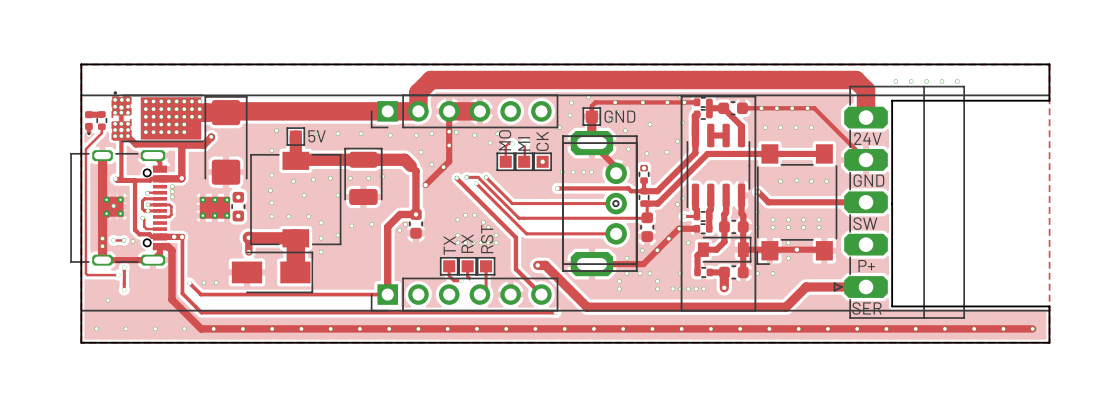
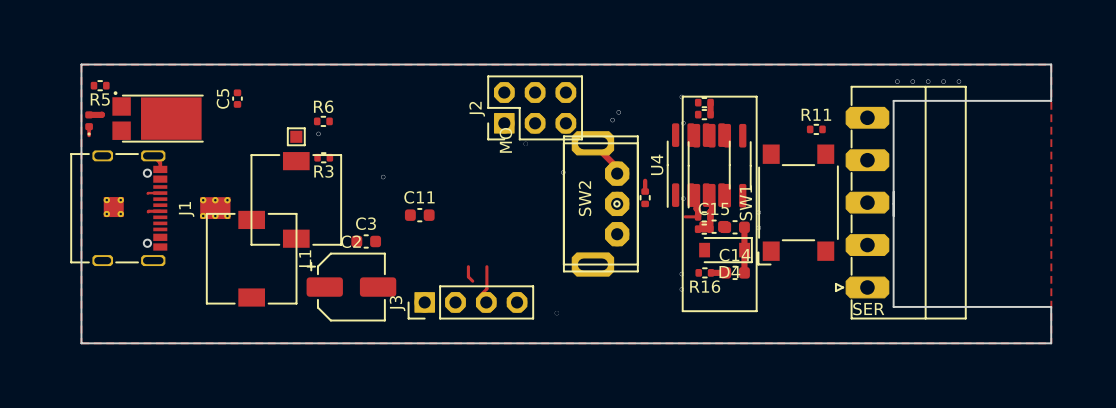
R5: none -> (100, 85)
line: (81, 95) (1049, 95) -> none
via: (588, 96) -> none
zone outline: (112, 97) (112, 139) (130, 139) (130, 97) (112, 97) -> none
C5: none -> (237, 98)
via: (115, 99) -> none
via: (121, 99) -> none
via: (128, 99) -> none
via: (145, 101) -> none
via: (153, 101) -> none
via: (161, 101) -> none
via: (168, 101) -> none
via: (176, 101) -> none
via: (184, 101) -> none
via: (191, 101) -> none
via: (199, 101) -> none
via: (571, 102) -> none
via: (615, 102) -> none
via: (642, 102) -> none
via: (667, 102) -> none
via: (684, 102) -> none
track: (697, 102) (595, 102) (591, 106) (591, 142) -> none
via: (115, 106) -> none
via: (128, 106) -> none
track: (121, 107) (121, 178) -> none
via: (121, 107) -> none
J2: none -> (535, 107)
track: (709, 108) (723, 108) (741, 126) (741, 135) -> none
part: (733, 108) -> none
track: (742, 108) (814, 108) (866, 159) -> none
via: (761, 108) -> none
via: (776, 108) -> none
via: (792, 108) -> none
via: (807, 108) -> none
via: (145, 109) -> none
via: (153, 109) -> none
via: (161, 109) -> none
via: (168, 109) -> none
via: (176, 109) -> none
via: (184, 109) -> none
via: (191, 109) -> none
via: (199, 109) -> none
part: (464, 111) -> none
track: (479, 111) (449, 111) (449, 161) (425, 185) -> none
via: (115, 112) -> none
via: (121, 112) -> none
via: (128, 112) -> none
track: (697, 114) (695, 116) (695, 153) (657, 191) (631, 191) (628, 188) (557, 188) -> none
via: (570, 115) -> none
via: (145, 116) -> none
via: (153, 116) -> none
via: (161, 116) -> none
via: (168, 116) -> none
via: (176, 116) -> none
via: (184, 116) -> none
via: (191, 116) -> none
via: (199, 116) -> none
part: (591, 116) -> none
text: GND (619, 116) -> none
track: (866, 117) (866, 90) (855, 80) (431, 80) (418, 92) (418, 111) (178, 112) (171, 119) -> none
part: (101, 120) -> none
R6: none -> (323, 121)
via: (115, 123) -> none
via: (121, 123) -> none
via: (128, 123) -> none
via: (145, 124) -> none
via: (153, 124) -> none
via: (161, 124) -> none
via: (168, 124) -> none
via: (176, 124) -> none
via: (184, 124) -> none
via: (649, 124) -> none
track: (101, 126) (101, 133) (85, 149) (85, 273) (118, 275) -> none
via: (559, 127) -> none
via: (765, 127) -> none
via: (780, 127) -> none
via: (795, 127) -> none
via: (811, 127) -> none
R11: none -> (816, 129)
via: (115, 130) -> none
track: (121, 130) (135, 144) (181, 144) (181, 178) -> none
via: (121, 130) -> none
via: (128, 130) -> none
via: (276, 130) -> none
via: (625, 130) -> none
via: (449, 131) -> none
via: (145, 132) -> none
via: (153, 132) -> none
via: (161, 132) -> none
via: (168, 132) -> none
via: (176, 132) -> none
via: (184, 132) -> none
via: (456, 132) -> none
via: (337, 133) -> none
via: (361, 133) -> none
via: (431, 133) -> none
via: (497, 133) -> none
via: (89, 135) -> none
via: (390, 135) -> none
via: (416, 135) -> none
via: (474, 135) -> none
track: (710, 135) (726, 135) -> none
via: (115, 136) -> none
via: (121, 136) -> none
via: (128, 136) -> none
track: (211, 136) (203, 145) (181, 145) (181, 178) -> none
via: (211, 136) -> none
track: (295, 136) (295, 160) (404, 159) (415, 171) (415, 214) (400, 214) (387, 226) (387, 294) (200, 294) (189, 283) -> none
text: 5V (317, 136) -> none
text: 24V (867, 138) -> none
part: (226, 140) -> none
text: CK (542, 141) -> none
via: (677, 141) -> none
via: (490, 142) -> none
track: (512, 143) (508, 143) (505, 146) (505, 161) -> none
via: (512, 143) -> none
track: (524, 143) (524, 161) -> none
text: MI (524, 143) -> none
via: (449, 145) -> none
via: (628, 149) -> none
via: (271, 150) -> none
via: (420, 152) -> none
via: (666, 152) -> none
via: (646, 153) -> none
track: (824, 153) (707, 153) (657, 203) (644, 203) -> none
track: (102, 155) (102, 260) (153, 260) (160, 253) (160, 246) (168, 246) (171, 250) (171, 299) (201, 328) (1032, 328) -> none
R3: none -> (323, 157)
part: (505, 161) -> none
part: (524, 161) -> none
part: (542, 161) -> none
via: (542, 161) -> none
via: (431, 164) -> none
U4: none -> (698, 165)
via: (443, 167) -> none
via: (644, 168) -> none
via: (573, 172) -> none
via: (583, 172) -> none
via: (591, 172) -> none
part: (644, 174) -> none
via: (271, 175) -> none
part: (363, 176) -> none
track: (456, 177) (515, 237) (515, 269) (541, 294) -> none
via: (456, 177) -> none
track: (466, 177) (478, 177) (519, 218) (646, 218) (648, 203) -> none
via: (466, 177) -> none
track: (486, 177) (512, 203) (616, 203) -> none
via: (486, 177) -> none
via: (115, 178) -> none
track: (181, 178) (152, 178) (150, 180) (115, 178) (121, 178) -> none
via: (181, 178) -> none
via: (330, 178) -> none
via: (350, 178) -> none
via: (368, 178) -> none
via: (313, 179) -> none
track: (116, 180) (135, 180) (135, 229) (139, 234) (149, 234) (152, 236) (182, 236) -> none
via: (796, 180) -> none
text: GND (868, 180) -> none
via: (293, 181) -> none
via: (780, 181) -> none
via: (811, 181) -> none
via: (826, 181) -> none
track: (476, 183) (526, 233) (616, 233) -> none
via: (476, 183) -> none
via: (425, 185) -> none
via: (172, 186) -> none
via: (557, 188) -> none
via: (270, 190) -> none
via: (172, 191) -> none
track: (758, 191) (768, 202) (866, 202) -> none
via: (758, 191) -> none
via: (147, 193) -> none
via: (304, 195) -> none
via: (337, 195) -> none
track: (726, 195) (724, 226) -> none
track: (741, 195) (743, 226) -> none
via: (172, 197) -> none
via: (238, 197) -> none
track: (160, 198) (144, 198) (142, 201) (142, 208) (147, 210) -> none
via: (271, 202) -> none
SW1 name: none -> SW1 (745, 202)
part: (599, 203) -> none
SW2: none -> (600, 203)
track: (148, 204) (169, 204) (171, 206) (171, 214) (169, 216) (160, 216) -> none
via: (148, 204) -> none
via: (677, 204) -> none
via: (113, 205) -> none
part: (238, 206) -> none
J1 name: none -> J1 (186, 209)
via: (147, 210) -> none
via: (415, 214) -> none
C11: none -> (419, 215)
via: (465, 215) -> none
via: (474, 215) -> none
via: (238, 216) -> none
via: (271, 216) -> none
via: (288, 216) -> none
via: (308, 216) -> none
via: (684, 216) -> none
track: (142, 218) (146, 229) (160, 229) -> none
via: (142, 218) -> none
via: (457, 219) -> none
via: (772, 219) -> none
via: (788, 219) -> none
via: (803, 219) -> none
via: (819, 219) -> none
via: (321, 222) -> none
via: (483, 222) -> none
part: (415, 223) -> none
text: SW (865, 223) -> none
via: (371, 224) -> none
via: (405, 224) -> none
via: (351, 225) -> none
C15: none -> (714, 226)
track: (724, 226) (724, 241) (716, 249) (703, 249) (697, 255) (697, 272) -> none
via: (488, 227) -> none
part: (647, 227) -> none
via: (772, 227) -> none
via: (788, 227) -> none
via: (803, 227) -> none
via: (819, 227) -> none
via: (679, 228) -> none
track: (696, 228) (678, 228) (643, 264) (591, 264) -> none
via: (399, 230) -> none
via: (337, 235) -> none
via: (457, 235) -> none
via: (496, 235) -> none
via: (174, 236) -> none
track: (182, 237) (182, 293) (201, 312) (555, 312) -> none
via: (182, 237) -> none
track: (248, 237) (295, 238) (295, 272) -> none
track: (248, 237) (248, 252) -> none
via: (248, 237) -> none
via: (102, 238) -> none
via: (321, 238) -> none
via: (668, 238) -> none
text: RST (487, 239) -> none
track: (113, 240) (123, 240) -> none
via: (113, 240) -> none
via: (123, 240) -> none
via: (132, 241) -> none
C3: none -> (366, 241)
via: (457, 242) -> none
via: (465, 242) -> none
via: (473, 242) -> none
via: (480, 242) -> none
via: (488, 242) -> none
via: (496, 242) -> none
via: (688, 242) -> none
via: (788, 242) -> none
text: RX (467, 243) -> none
text: TX (449, 245) -> none
via: (102, 246) -> none
track: (743, 249) (824, 250) -> none
via: (796, 249) -> none
via: (642, 250) -> none
via: (657, 250) -> none
via: (248, 252) -> none
via: (321, 252) -> none
C14 name: none -> C14 (735, 255)
L1: none -> (251, 258)
via: (626, 258) -> none
via: (788, 258) -> none
track: (537, 265) (545, 265) (587, 307) (786, 307) (806, 287) (866, 287) -> none
via: (537, 265) -> none
track: (449, 266) (449, 275) (454, 280) (461, 280) -> none
part: (449, 266) -> none
part: (467, 266) -> none
part: (486, 266) -> none
text: P+ (866, 266) -> none
track: (124, 267) (124, 283) -> none
via: (124, 267) -> none
D4 name: none -> D4 (729, 272)
part: (272, 272) -> none
track: (724, 272) (724, 287) -> none
via: (626, 273) -> none
via: (640, 273) -> none
via: (649, 273) -> none
via: (757, 273) -> none
via: (772, 273) -> none
via: (118, 275) -> none
via: (461, 280) -> none
via: (471, 280) -> none
via: (619, 281) -> none
via: (657, 281) -> none
via: (203, 282) -> none
via: (216, 282) -> none
track: (124, 283) (124, 289) -> none
via: (189, 283) -> none
C2: none -> (351, 287)
R16 name: none -> R16 (705, 286)
via: (724, 287) -> none
via: (619, 288) -> none
via: (657, 288) -> none
via: (673, 288) -> none
via: (688, 288) -> none
via: (696, 288) -> none
via: (703, 288) -> none
via: (124, 289) -> none
part: (464, 294) -> none
via: (107, 300) -> none
J3: none -> (470, 302)
line: (81, 310) (1049, 310) -> none
via: (96, 328) -> none
via: (125, 328) -> none
via: (155, 328) -> none
via: (184, 328) -> none
via: (213, 328) -> none
via: (242, 328) -> none
via: (272, 328) -> none
via: (301, 328) -> none
via: (330, 328) -> none
via: (359, 328) -> none
via: (389, 328) -> none
via: (418, 328) -> none
via: (447, 328) -> none
via: (476, 328) -> none
via: (506, 328) -> none
via: (535, 328) -> none
via: (564, 328) -> none
via: (593, 328) -> none
via: (623, 328) -> none
via: (652, 328) -> none
via: (681, 328) -> none
via: (710, 328) -> none
via: (740, 328) -> none
via: (769, 328) -> none
via: (798, 328) -> none
via: (827, 328) -> none
via: (857, 328) -> none
via: (886, 328) -> none
via: (915, 328) -> none
via: (944, 328) -> none
via: (974, 328) -> none
via: (1003, 328) -> none
via: (1032, 328) -> none

